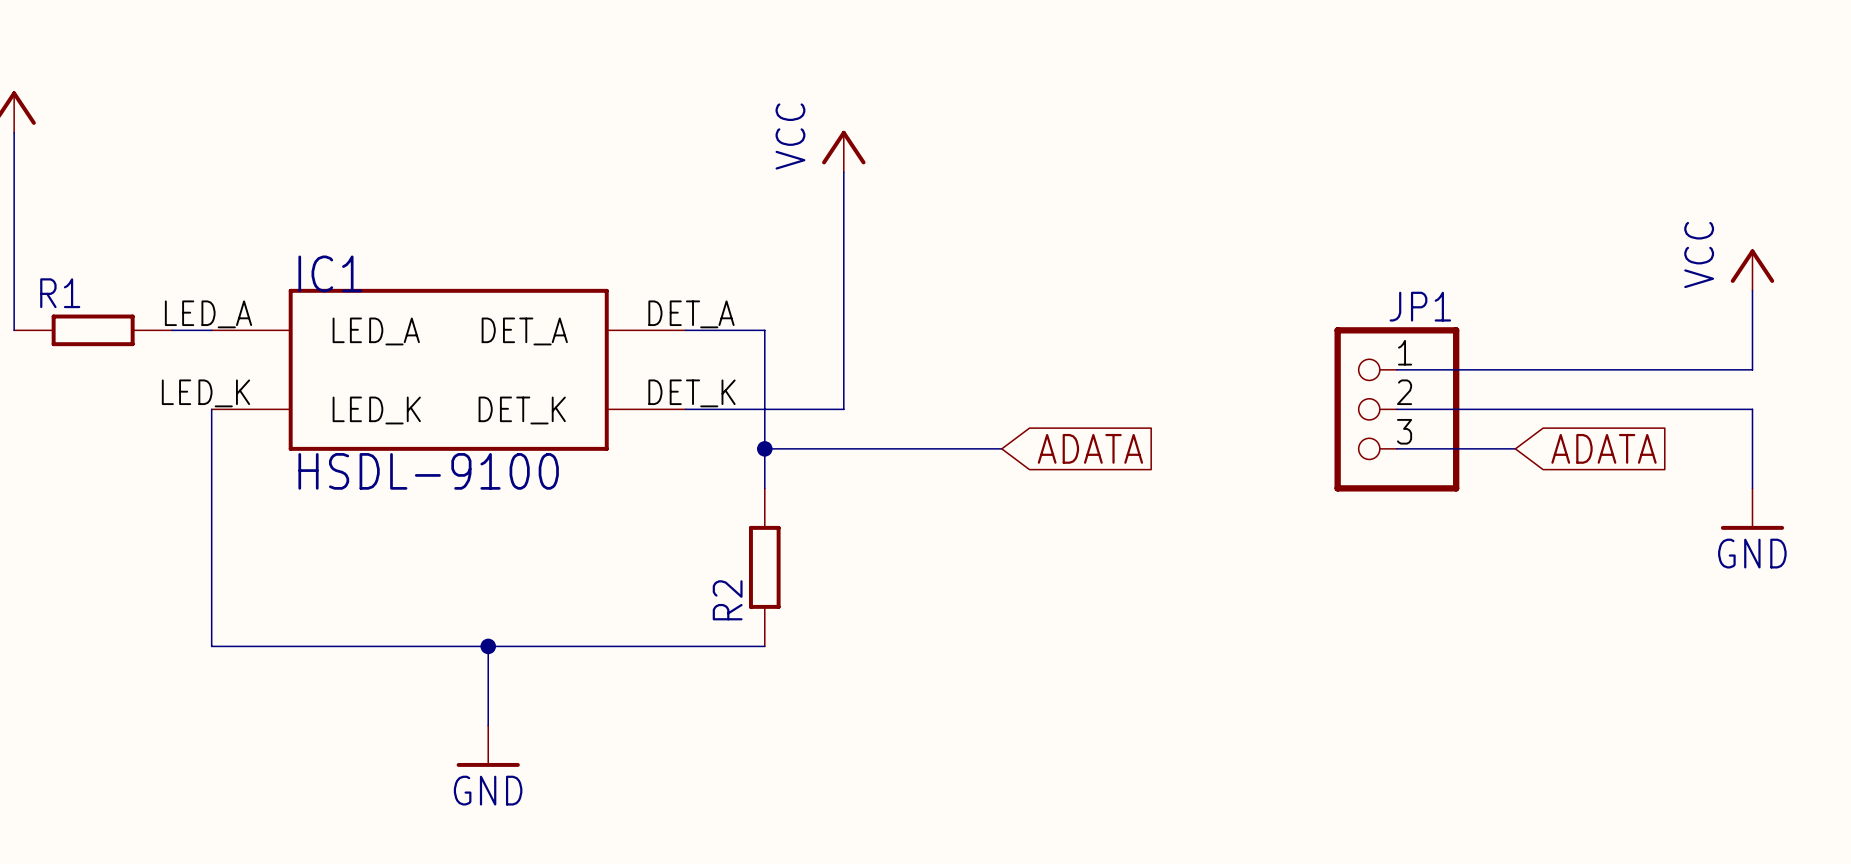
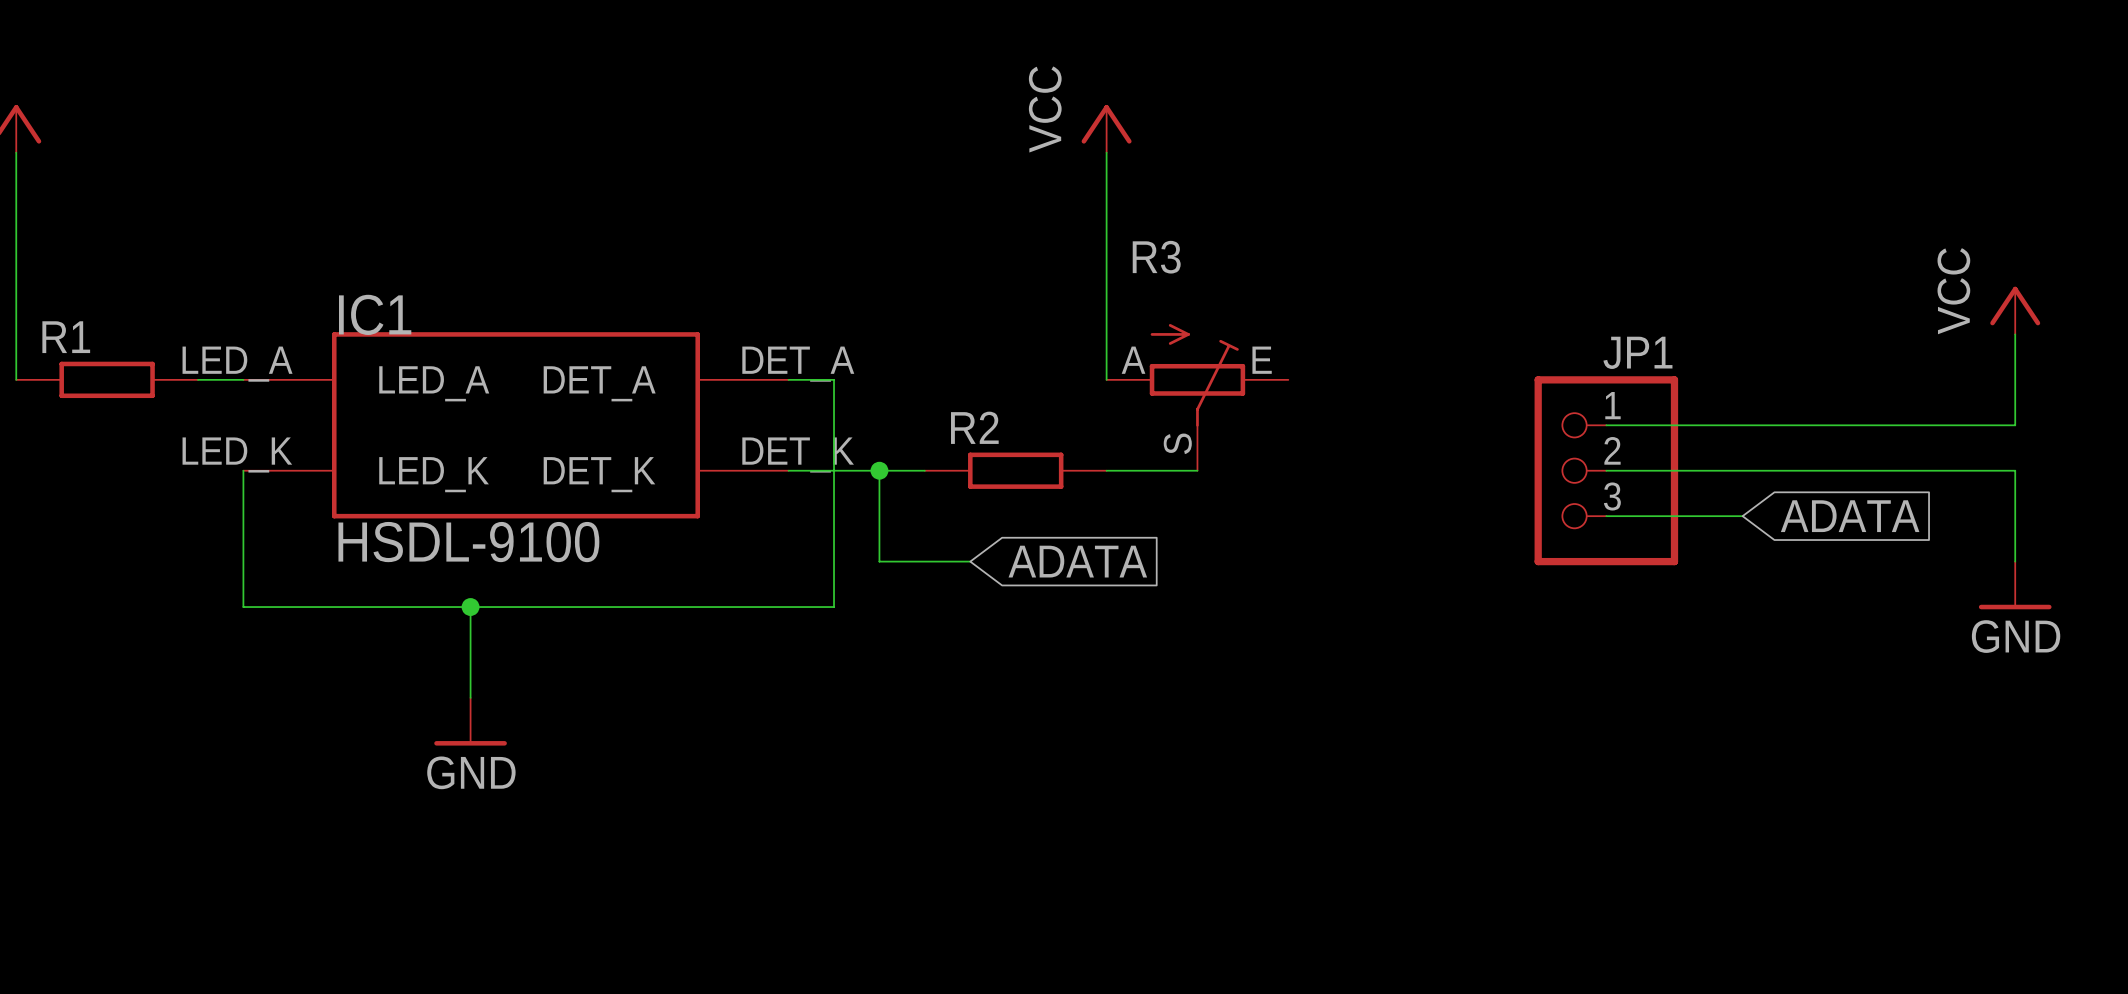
wire: none -> (1106, 152) (1106, 379)
power symbol position: VCC (843, 151) -> VCC (1106, 128)
wire: (843, 172) (843, 409) (804, 409) -> none
wire: (725, 330) (764, 330) (764, 409) -> none
R3: none -> (1197, 397)
wire: none -> (1106, 470) (1197, 470)
wire: (764, 448) (1001, 448) -> none
junction position: (764, 448) -> (879, 470)
global label position: ADATA (1090, 448) -> ADATA (1077, 561)
wire: none -> (879, 561) (970, 561)
wire: (211, 527) (211, 646) (764, 646) -> (243, 607) (834, 607) (834, 379)
junction: none -> (470, 607)
R2 rotation: 0° (764, 567) -> 90° clockwise (1015, 470)
R2 position: (764, 567) -> (1015, 470)
wire: (488, 646) (488, 725) -> (470, 607) (470, 697)
junction: (488, 646) -> none
power symbol position: GND (488, 746) -> GND (470, 721)

